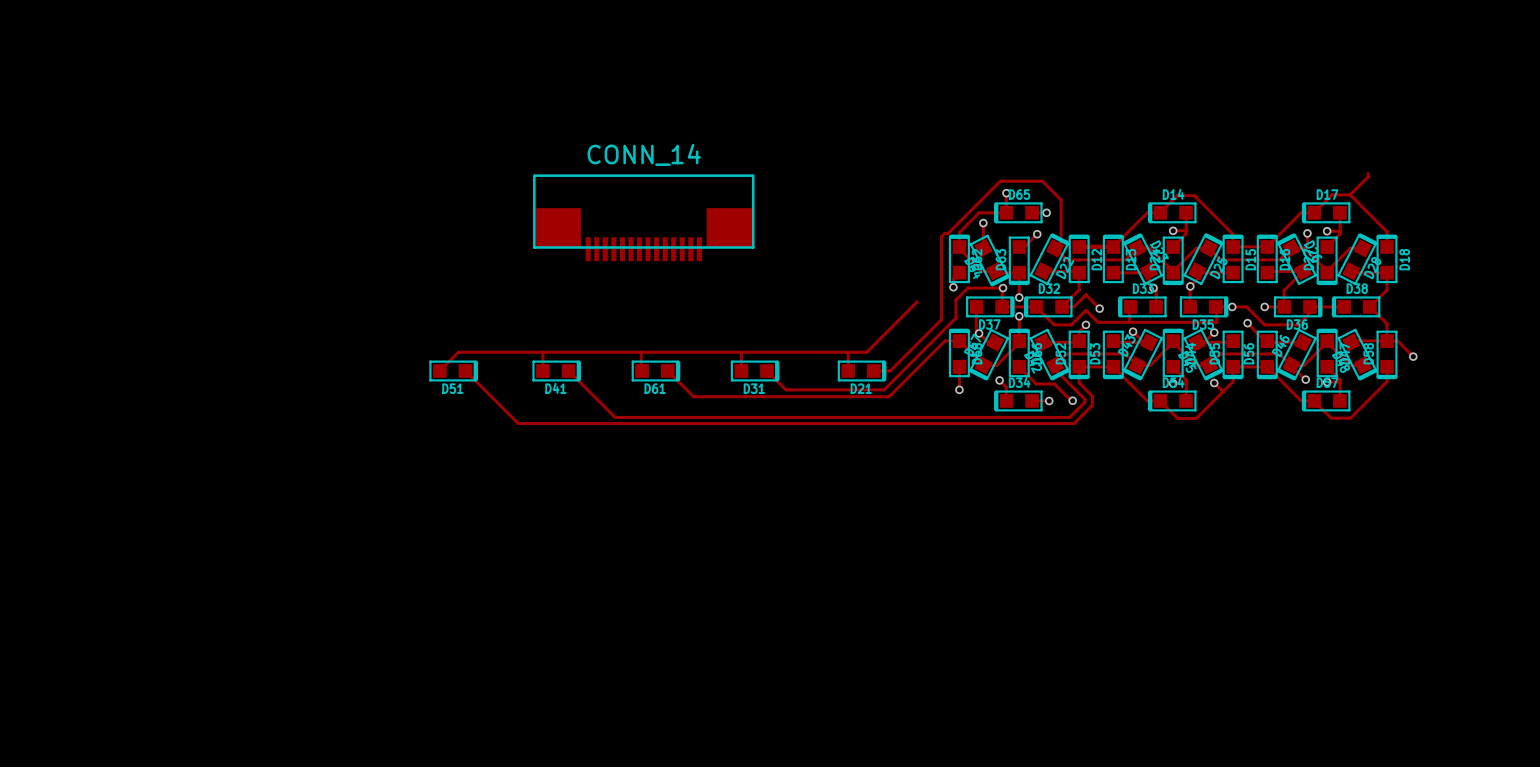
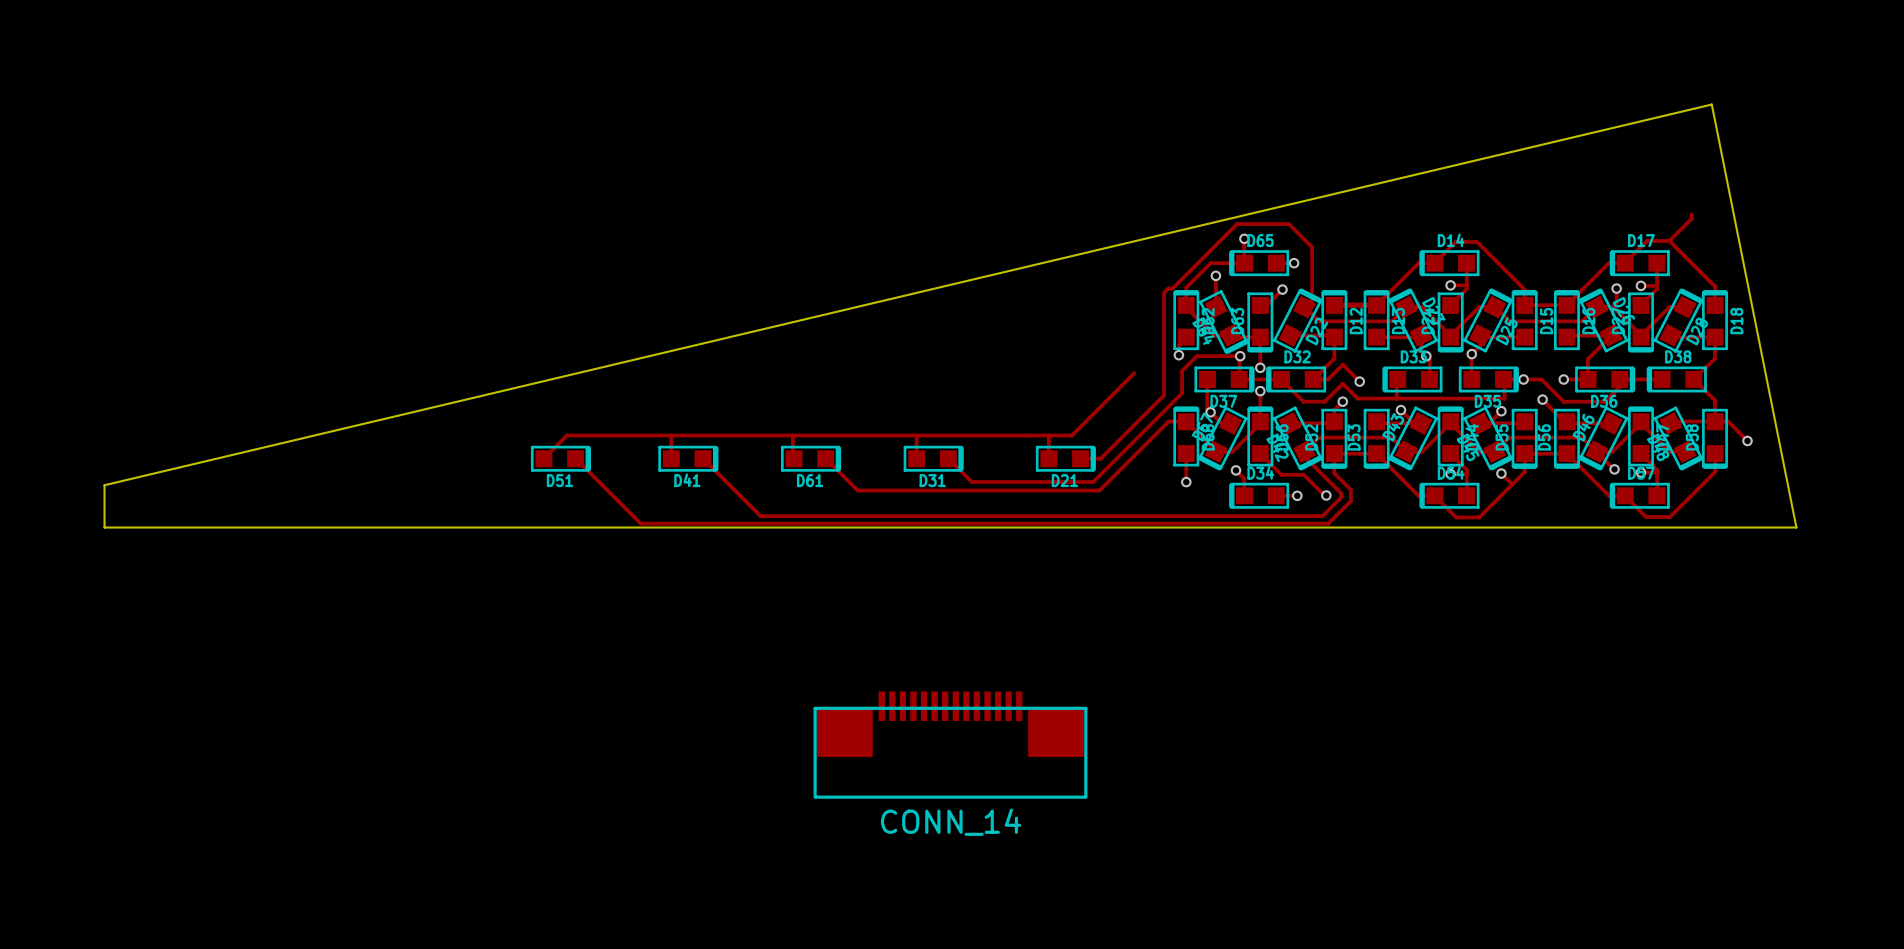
board edge: none -> (1711, 104) (104, 485) (104, 527) (1796, 527) (1711, 104)
part rotation: 0° (643, 217) -> 180° (950, 745)
part position: (643, 217) -> (950, 745)

